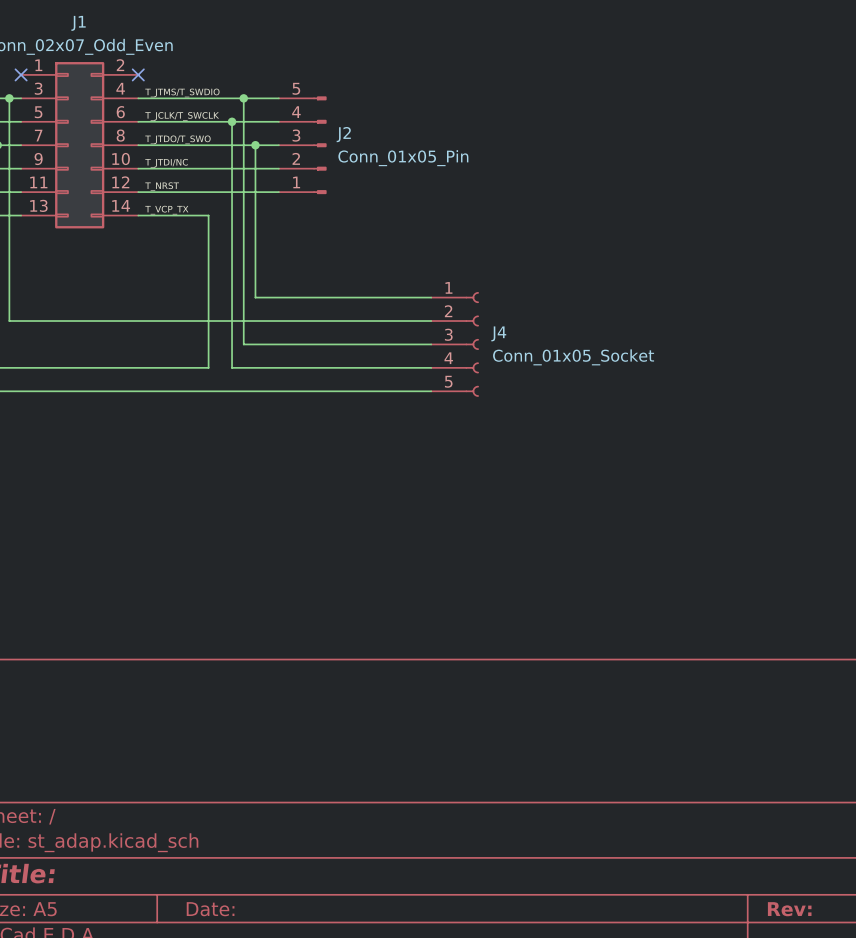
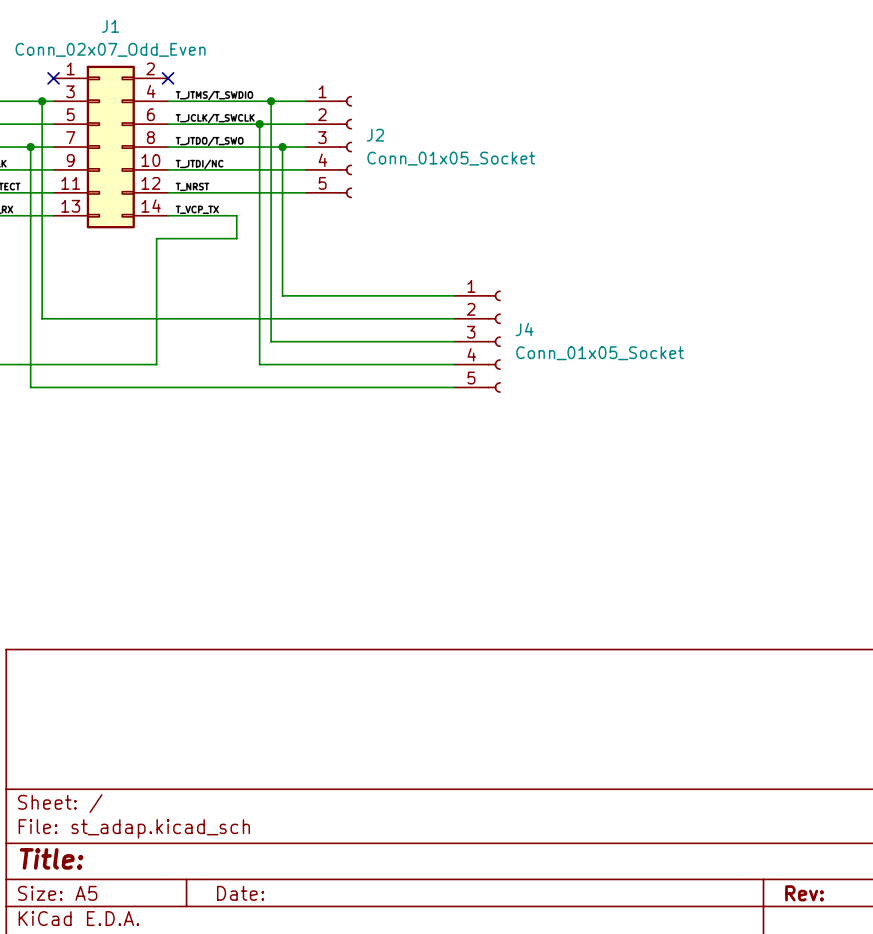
J2 symbol: [278, 96, 327, 194] -> [305, 95, 352, 199]
J2 value: Conn_01x05_Pin (403, 158) -> Conn_01x05_Socket (451, 158)
wire: (208, 238) (208, 367) (126, 367) -> (236, 238) (156, 238) (156, 364)

